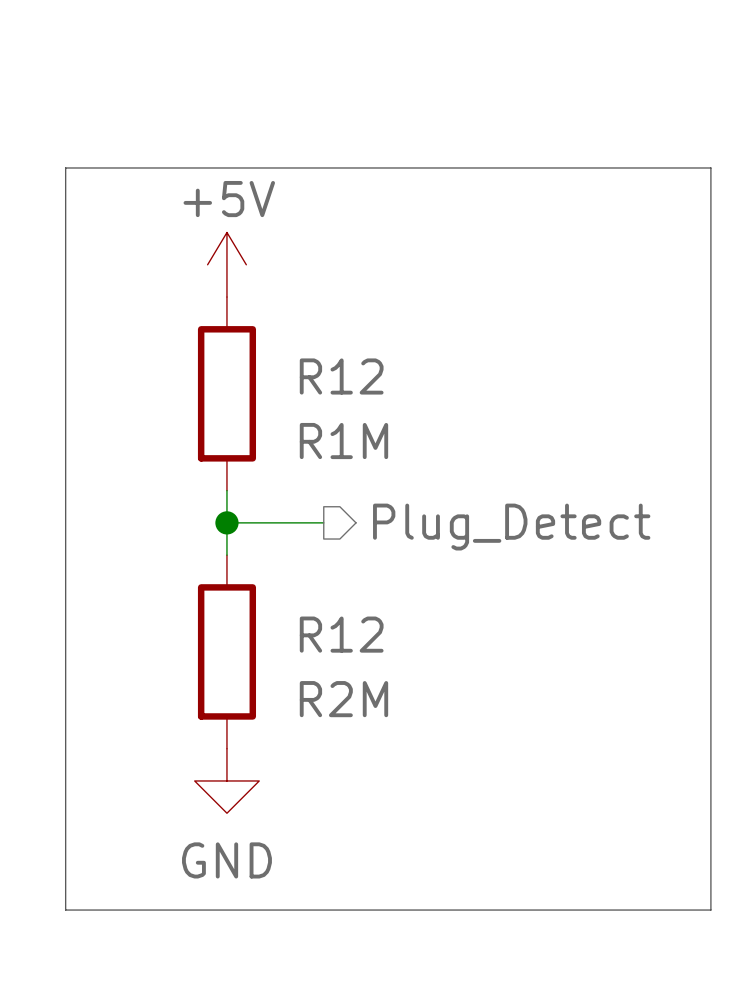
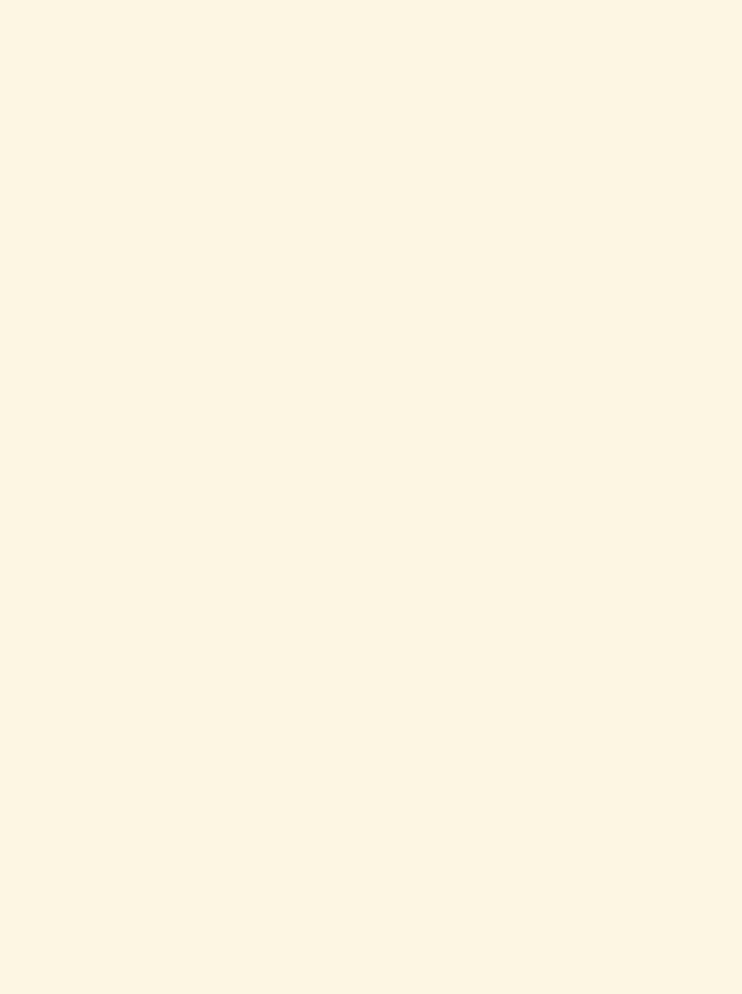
line: (65, 167) (710, 167) (710, 910) (65, 910) (65, 167) -> none
power symbol: +5V (226, 264) -> none
R12: R1M (226, 393) -> none
wire: (226, 490) (226, 555) -> none
wire: (226, 522) (323, 522) -> none
junction: (226, 522) -> none
hierarchical label: Plug_Detect (511, 527) -> none
R12: R2M (226, 651) -> none
power symbol: GND (226, 780) -> none

